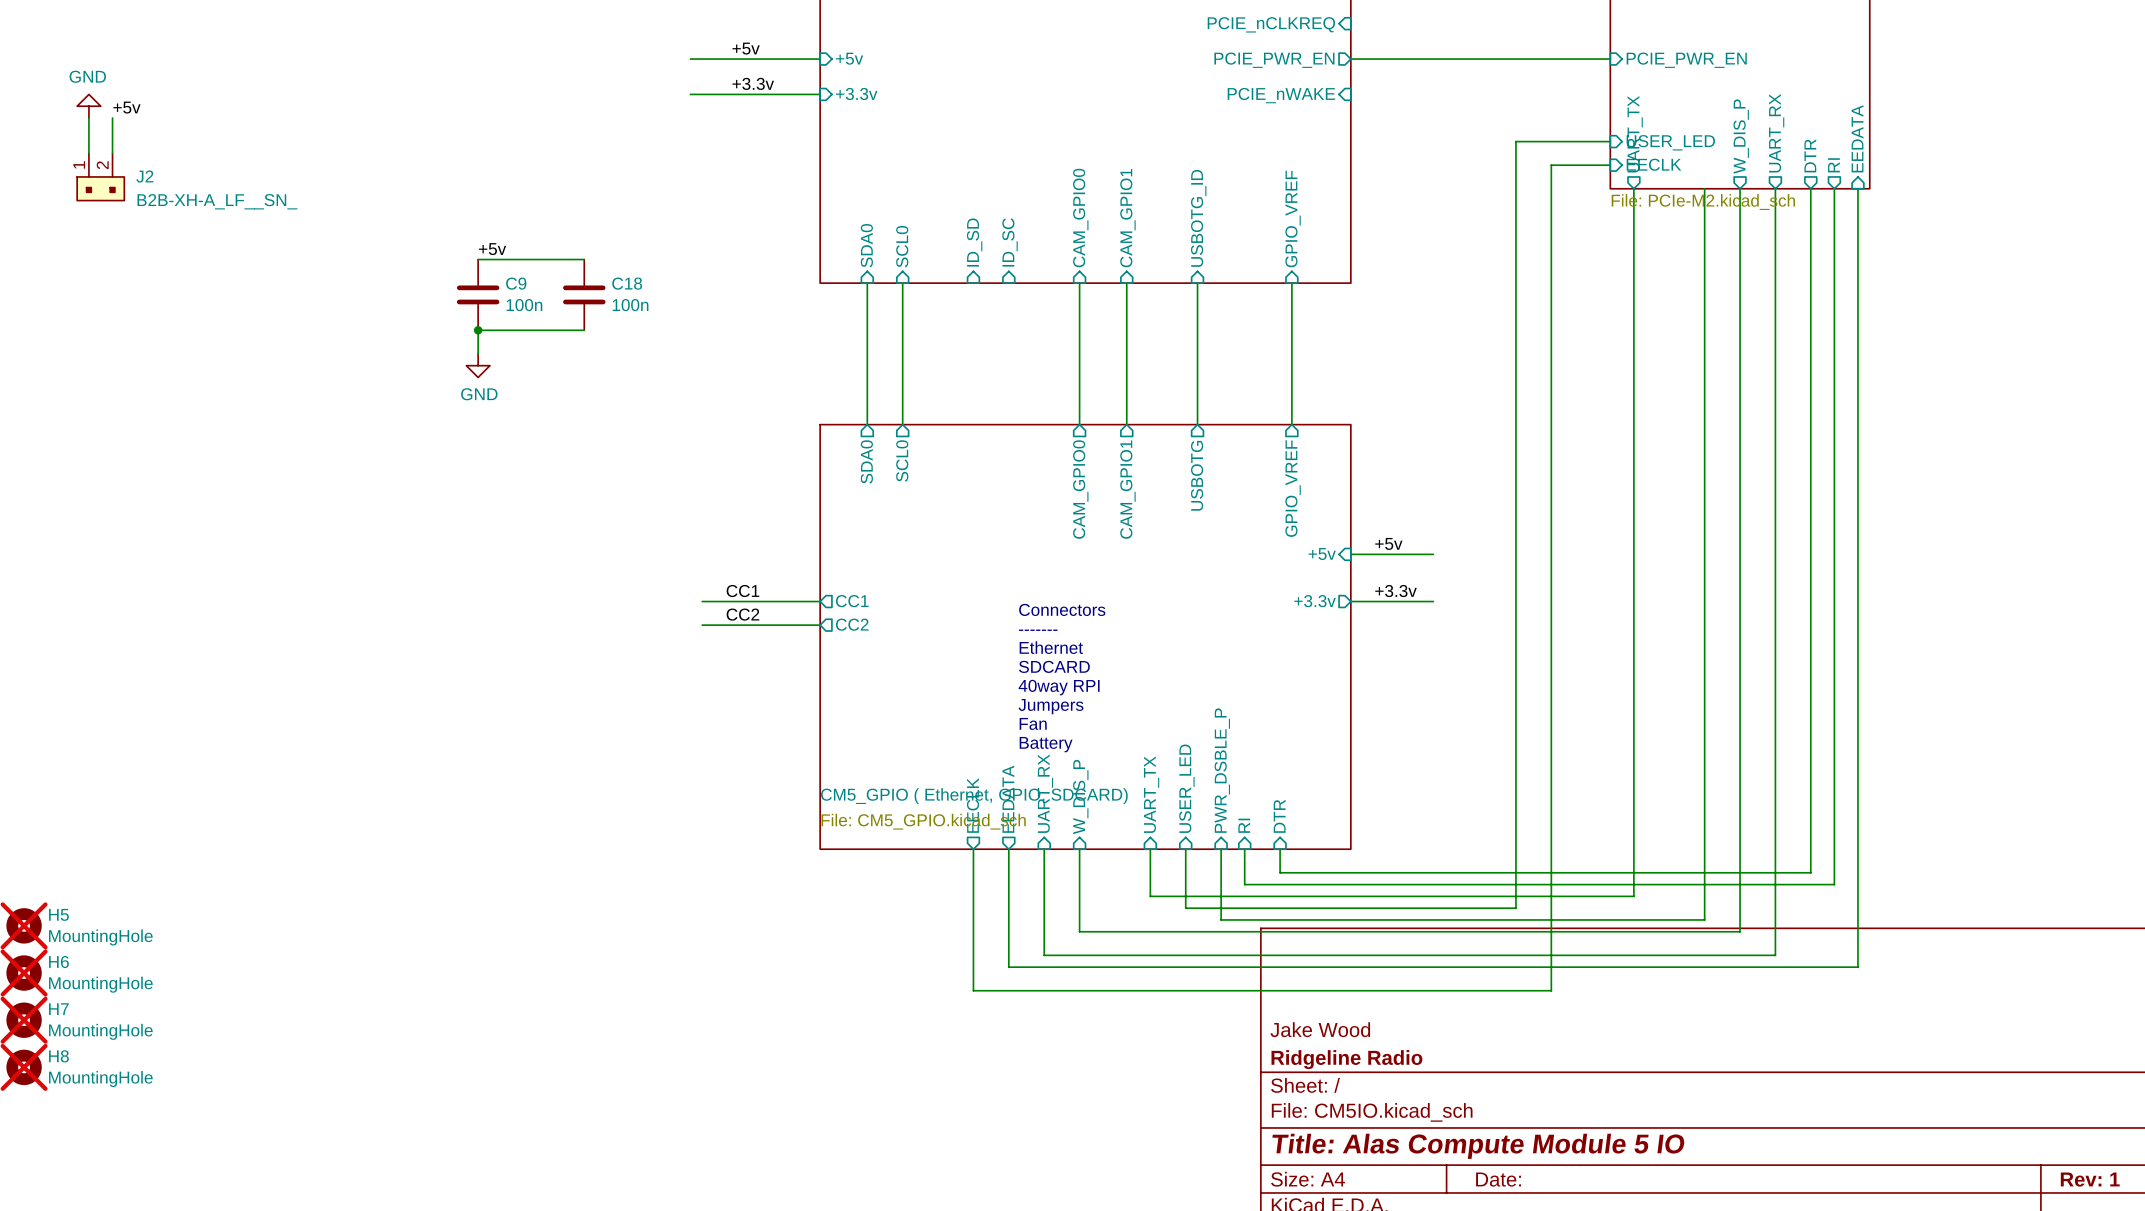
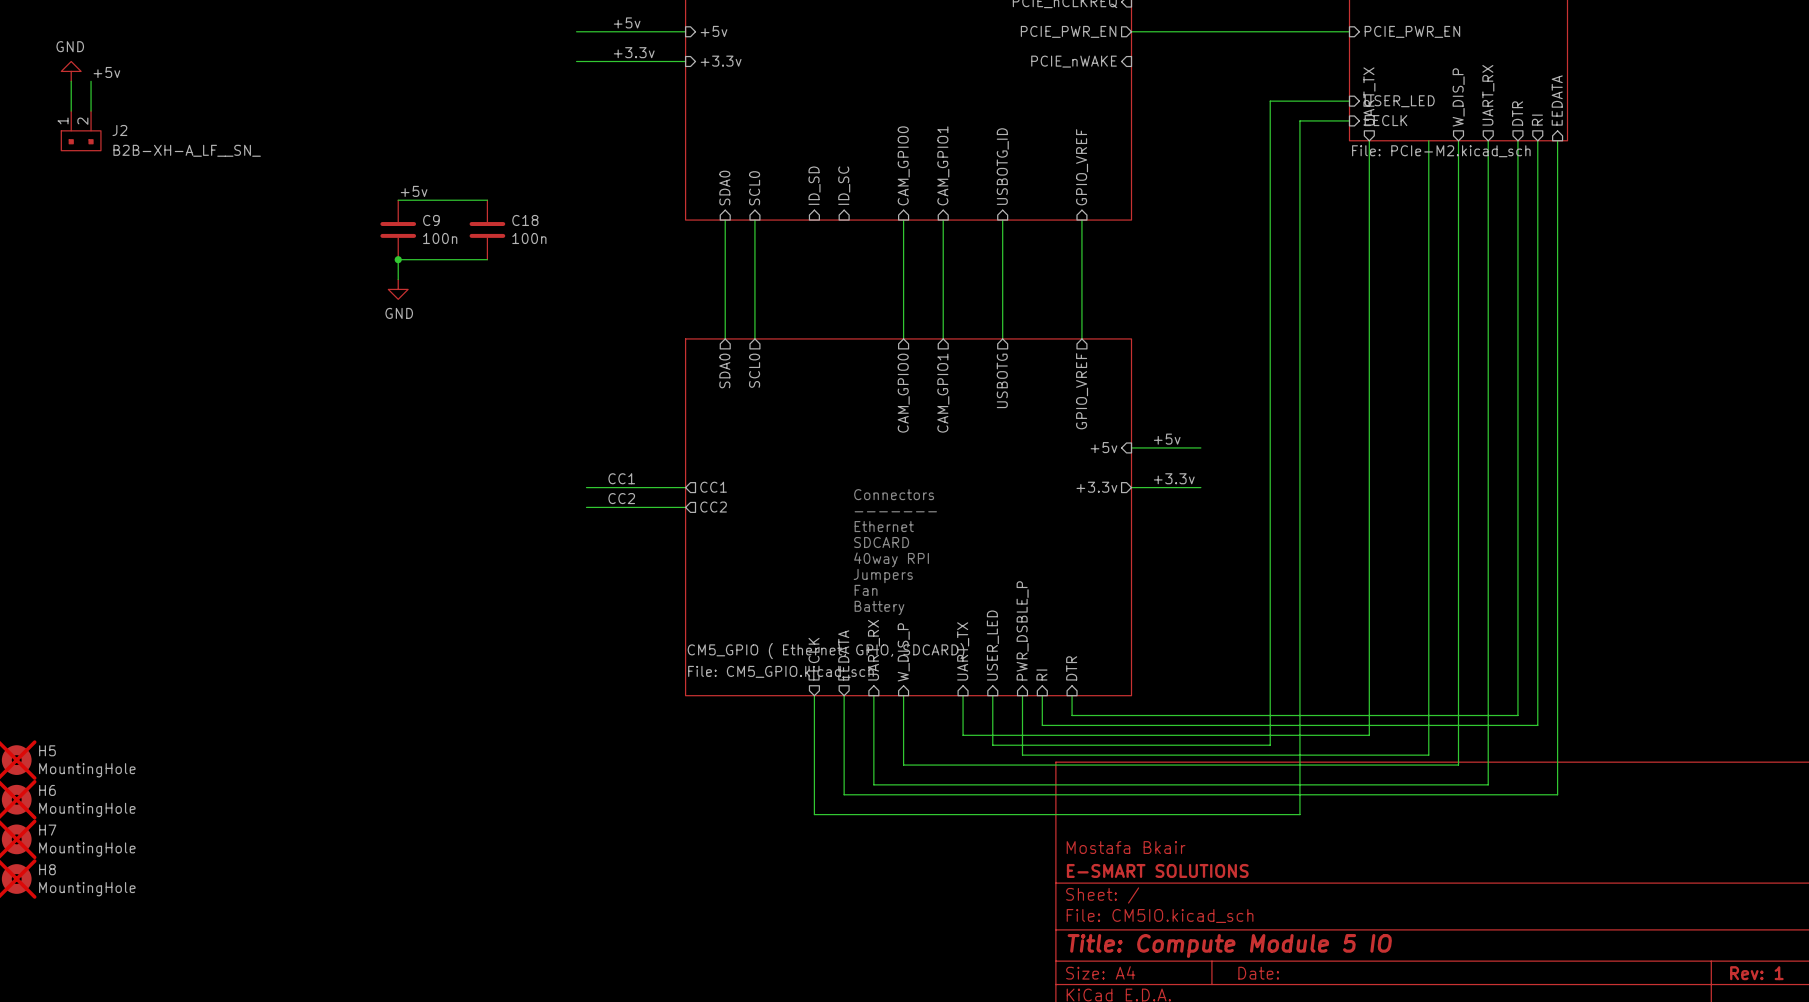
title block: Jake Wood (1320, 1029) -> Mostafa Bkair (1126, 847)
title block: Ridgeline Radio (1346, 1059) -> E-SMART SOLUTIONS (1157, 870)
title block: Title: Alas Compute Module 5 IO (1478, 1146) -> Title: Compute Module 5 IO (1229, 945)

